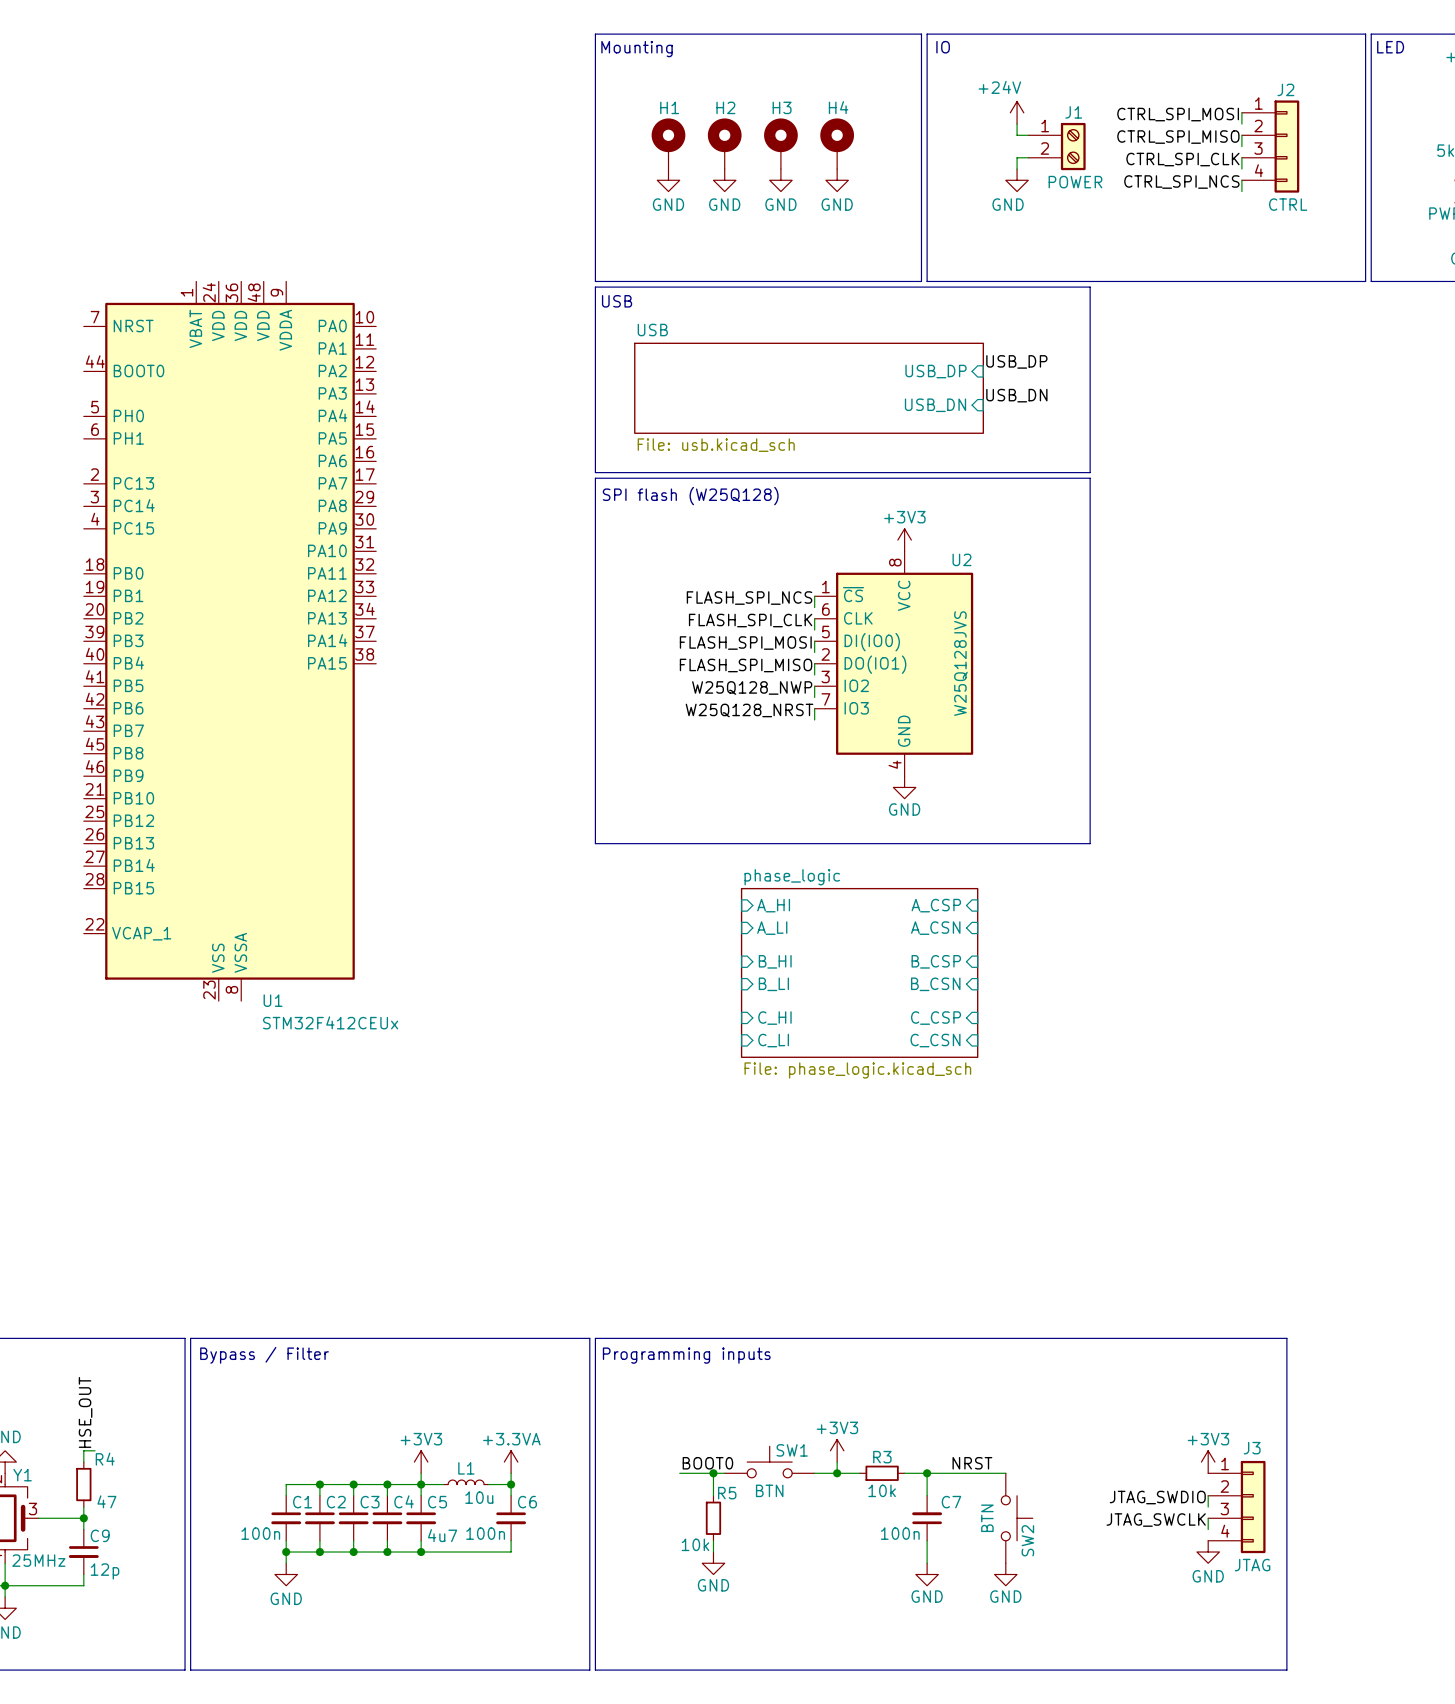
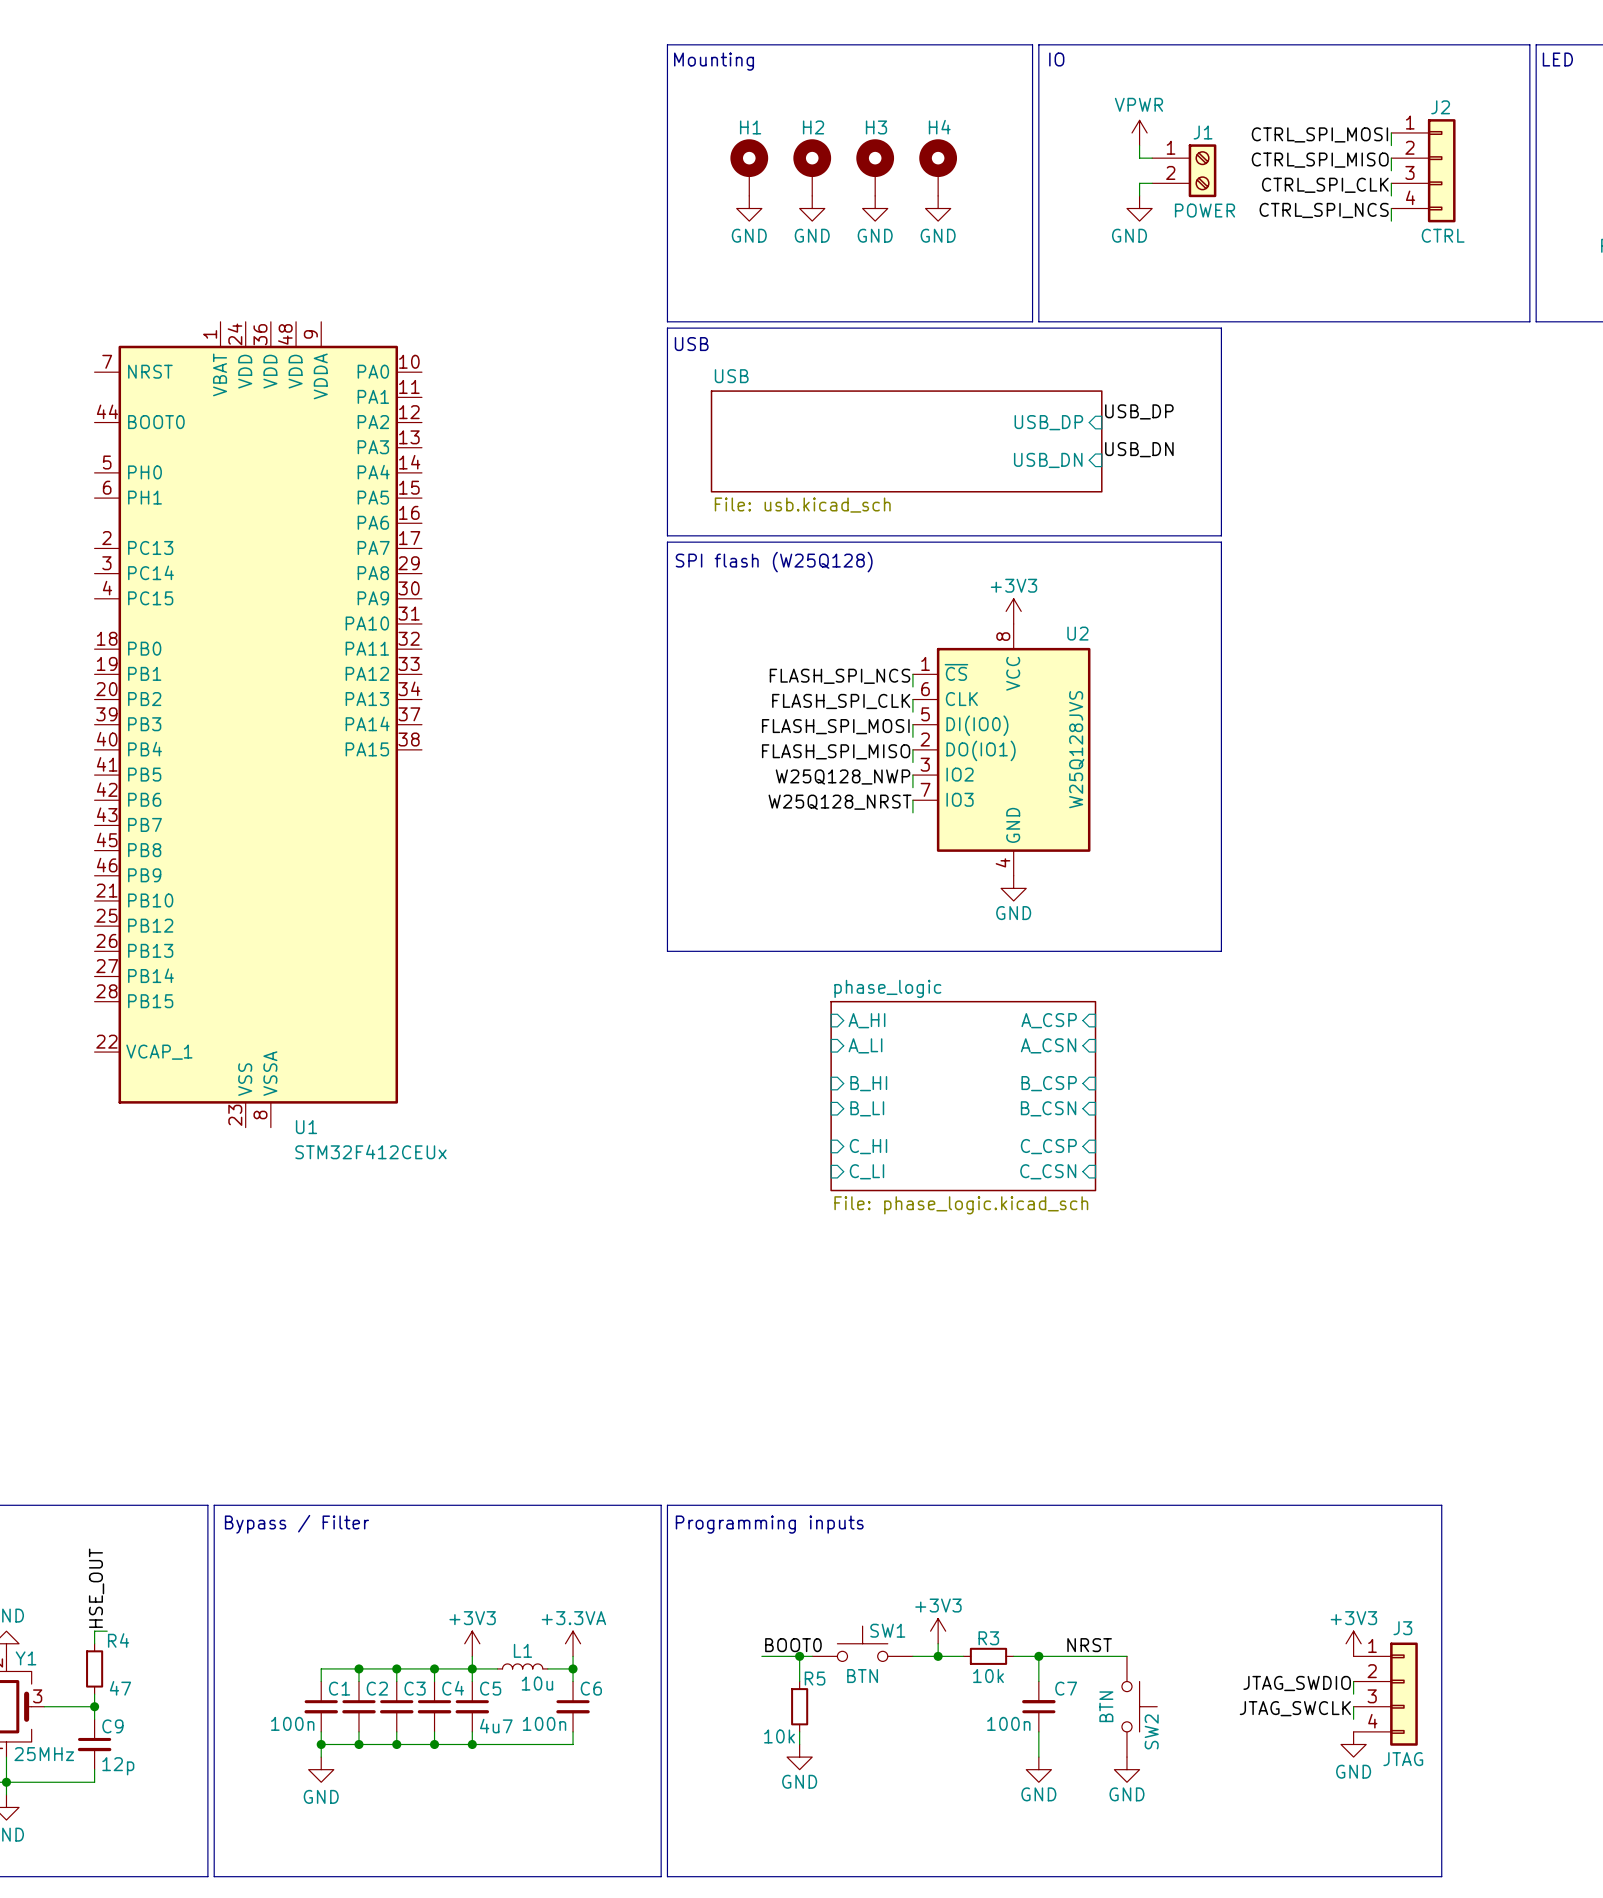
power symbol: +24V (1017, 112) -> VPWR (1139, 132)

